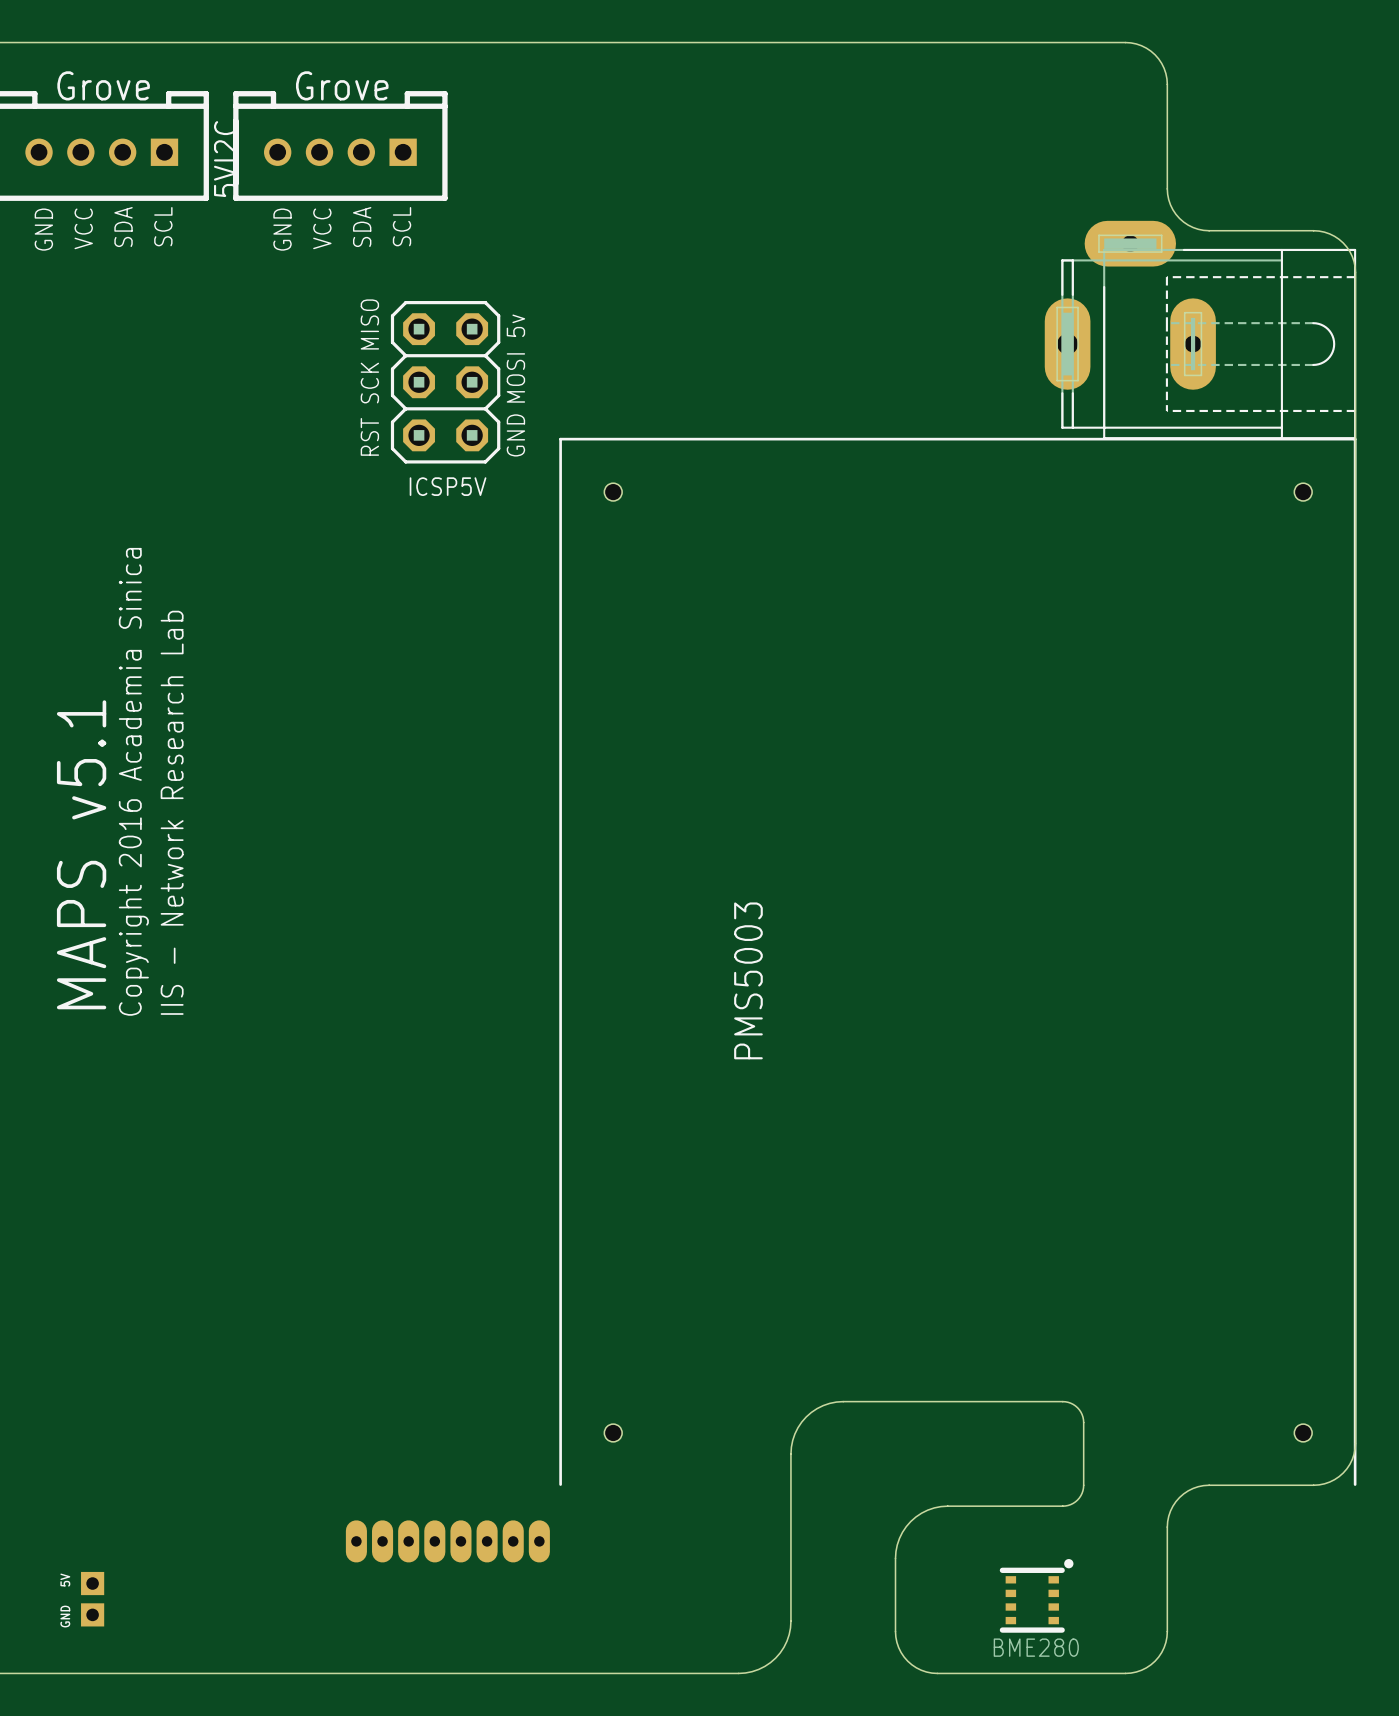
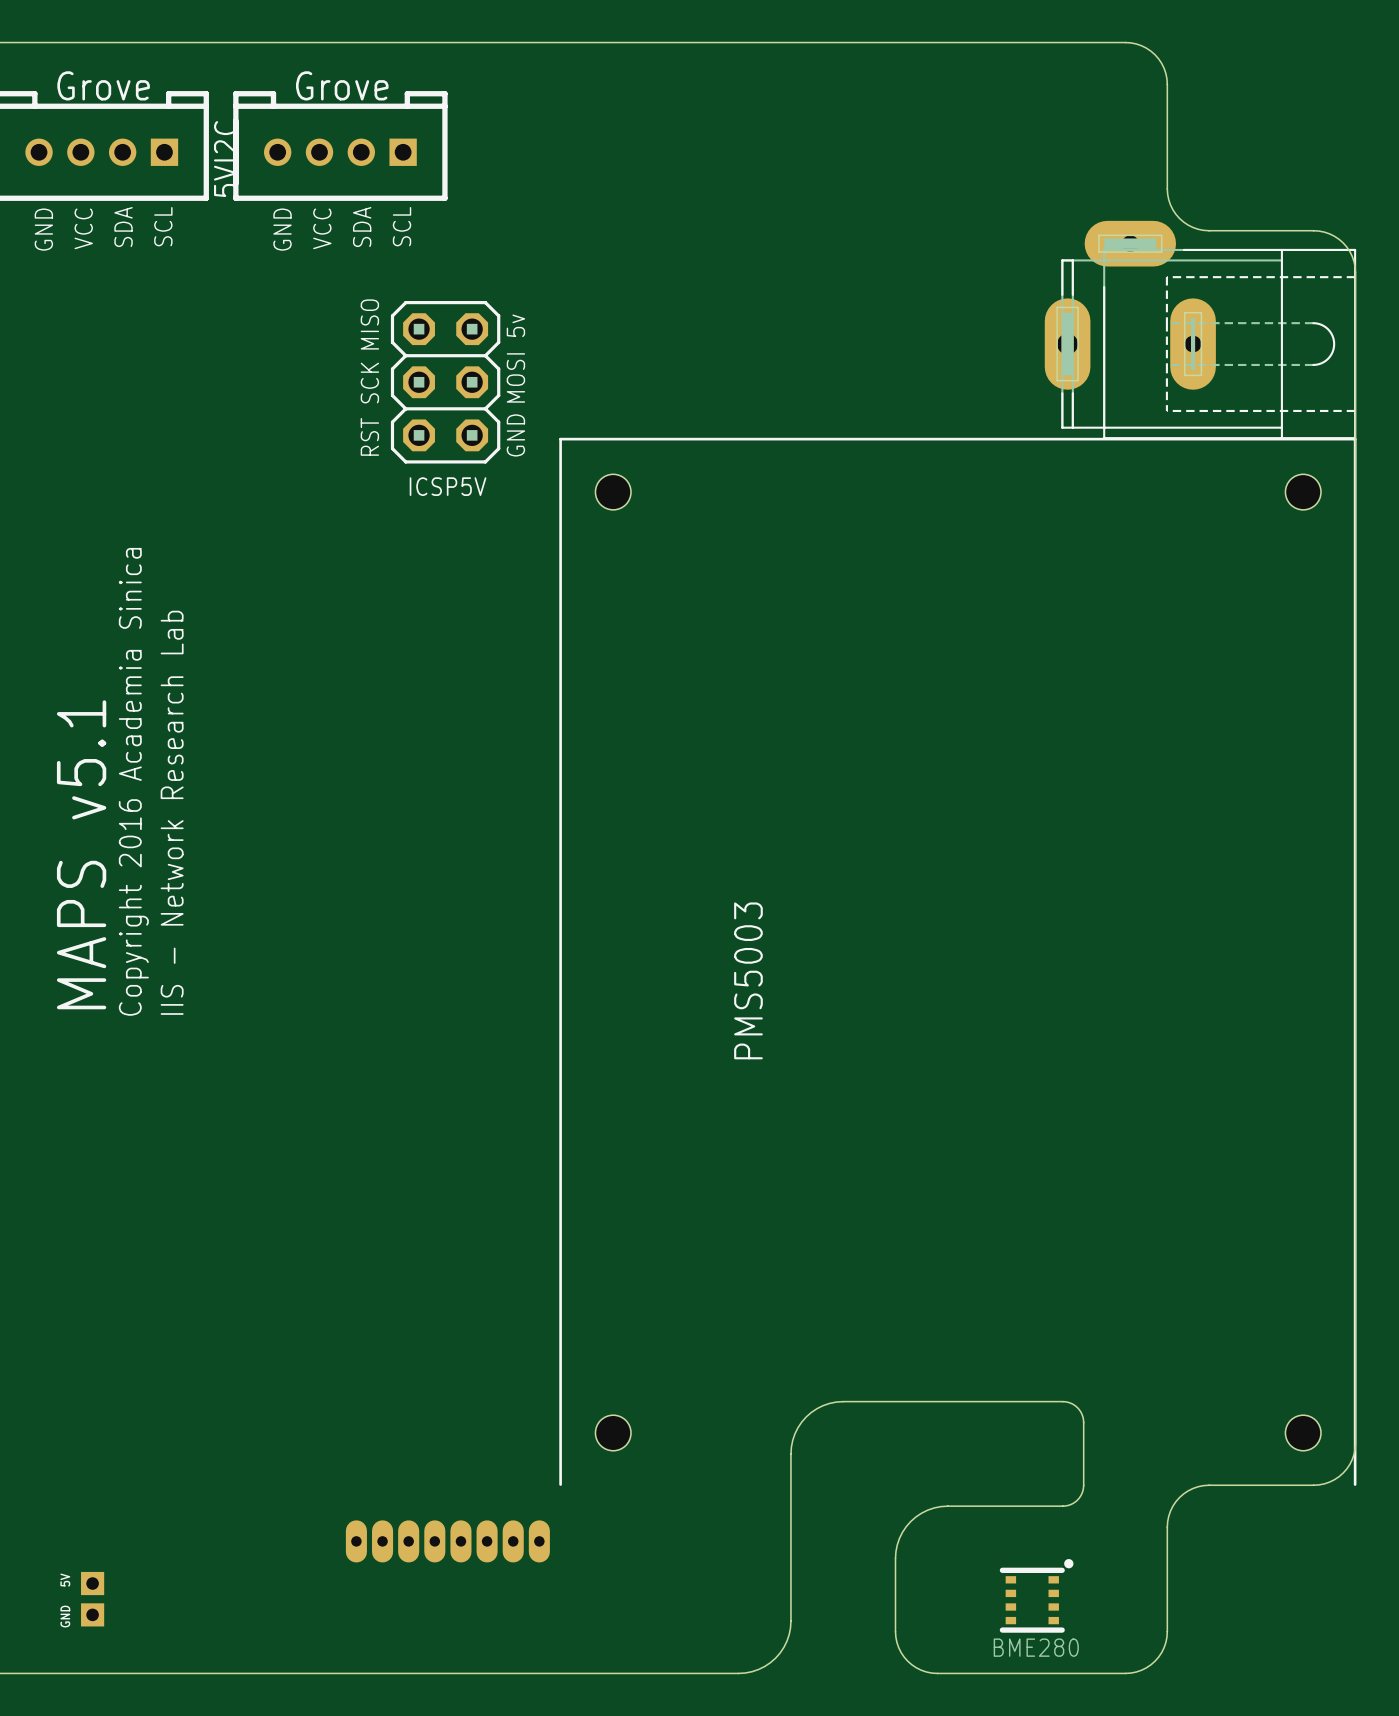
hole size: [604, 483, 623, 501] -> [595, 474, 632, 510]
hole size: [1294, 483, 1313, 501] -> [1285, 474, 1322, 510]
hole size: [604, 1424, 623, 1442] -> [595, 1415, 632, 1451]
hole size: [1294, 1424, 1313, 1442] -> [1285, 1415, 1322, 1451]

